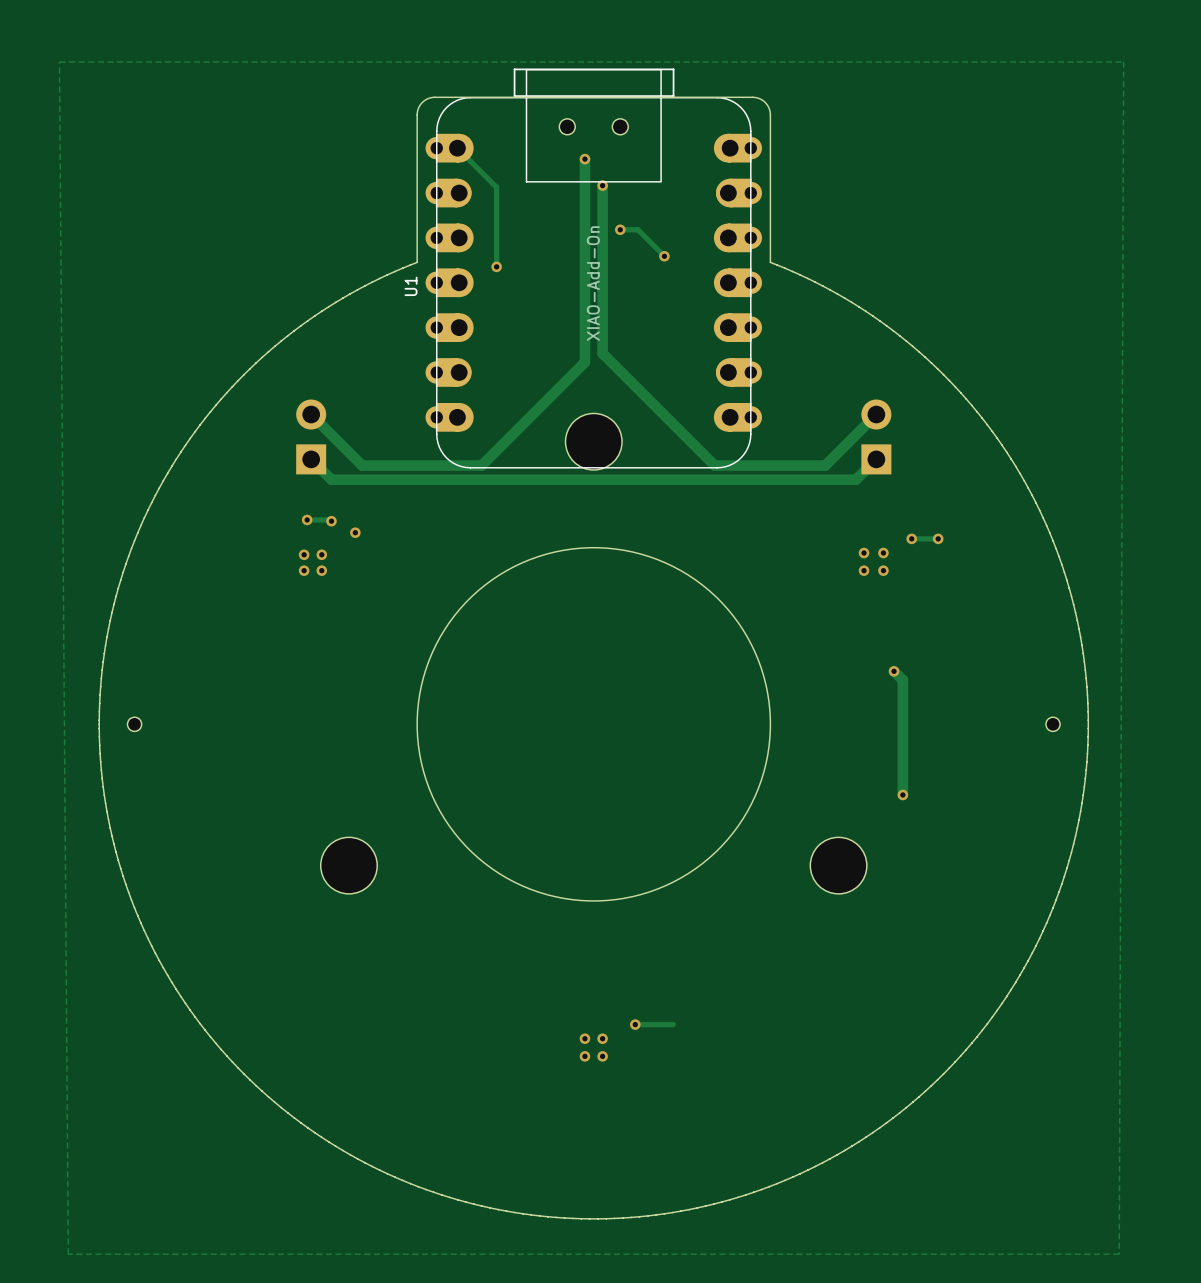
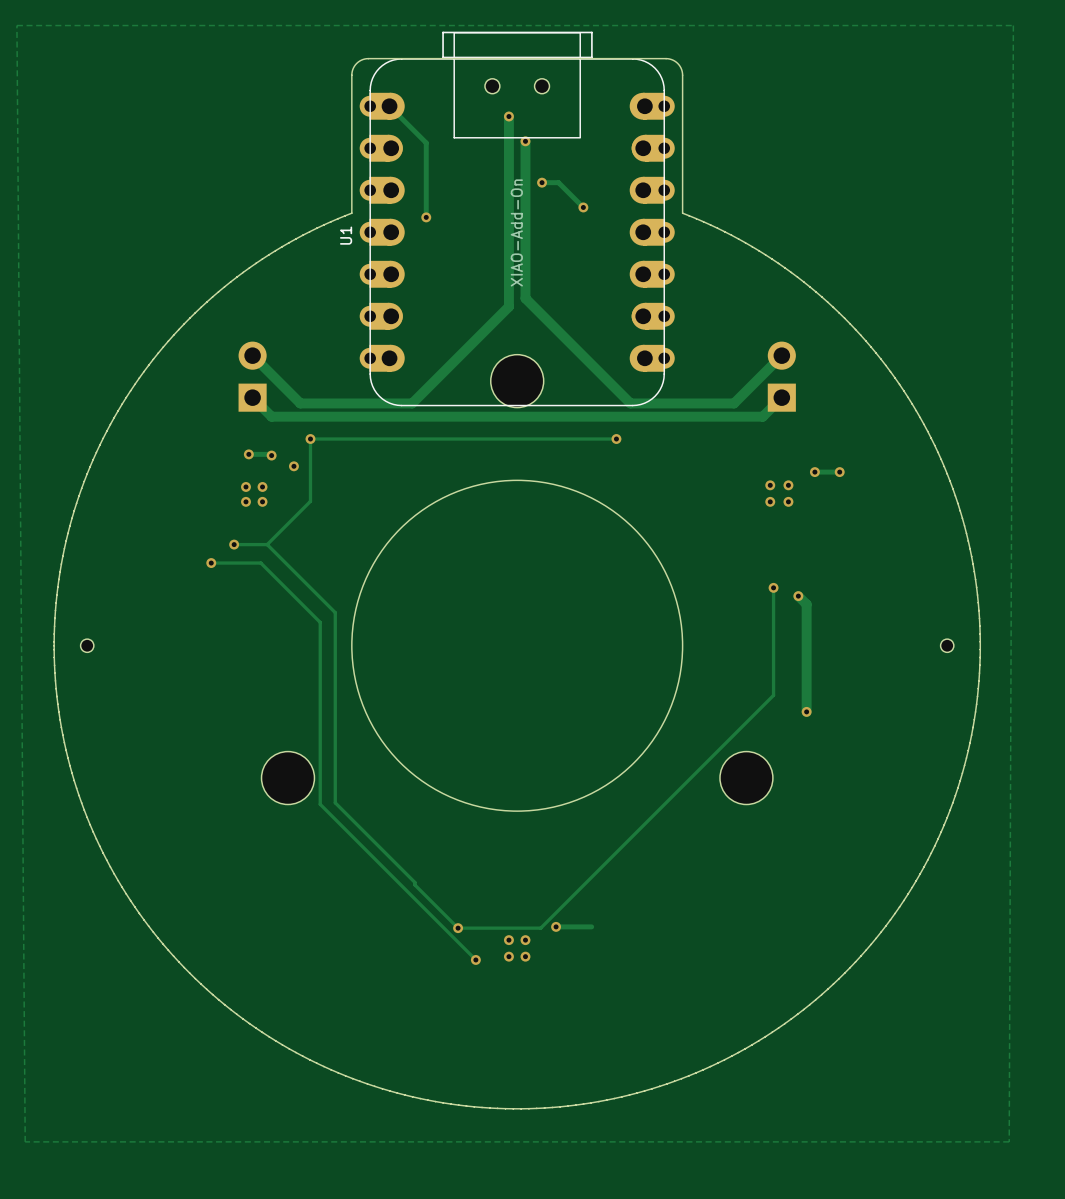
via: none -> (310, 439)
track: none -> (616, 439) (310, 439) (310, 501) (267, 544)
via: none -> (616, 439)
via: none -> (234, 544)
track: none -> (267, 544) (335, 612) (335, 802) (458, 928) (540, 928) (773, 695) (773, 587)
track: none -> (267, 544) (234, 544)
track: none -> (211, 563) (260, 563) (320, 622) (320, 804) (475, 959)
via: none -> (211, 563)
via: none -> (773, 587)
via: none -> (458, 928)
via: none -> (475, 959)

